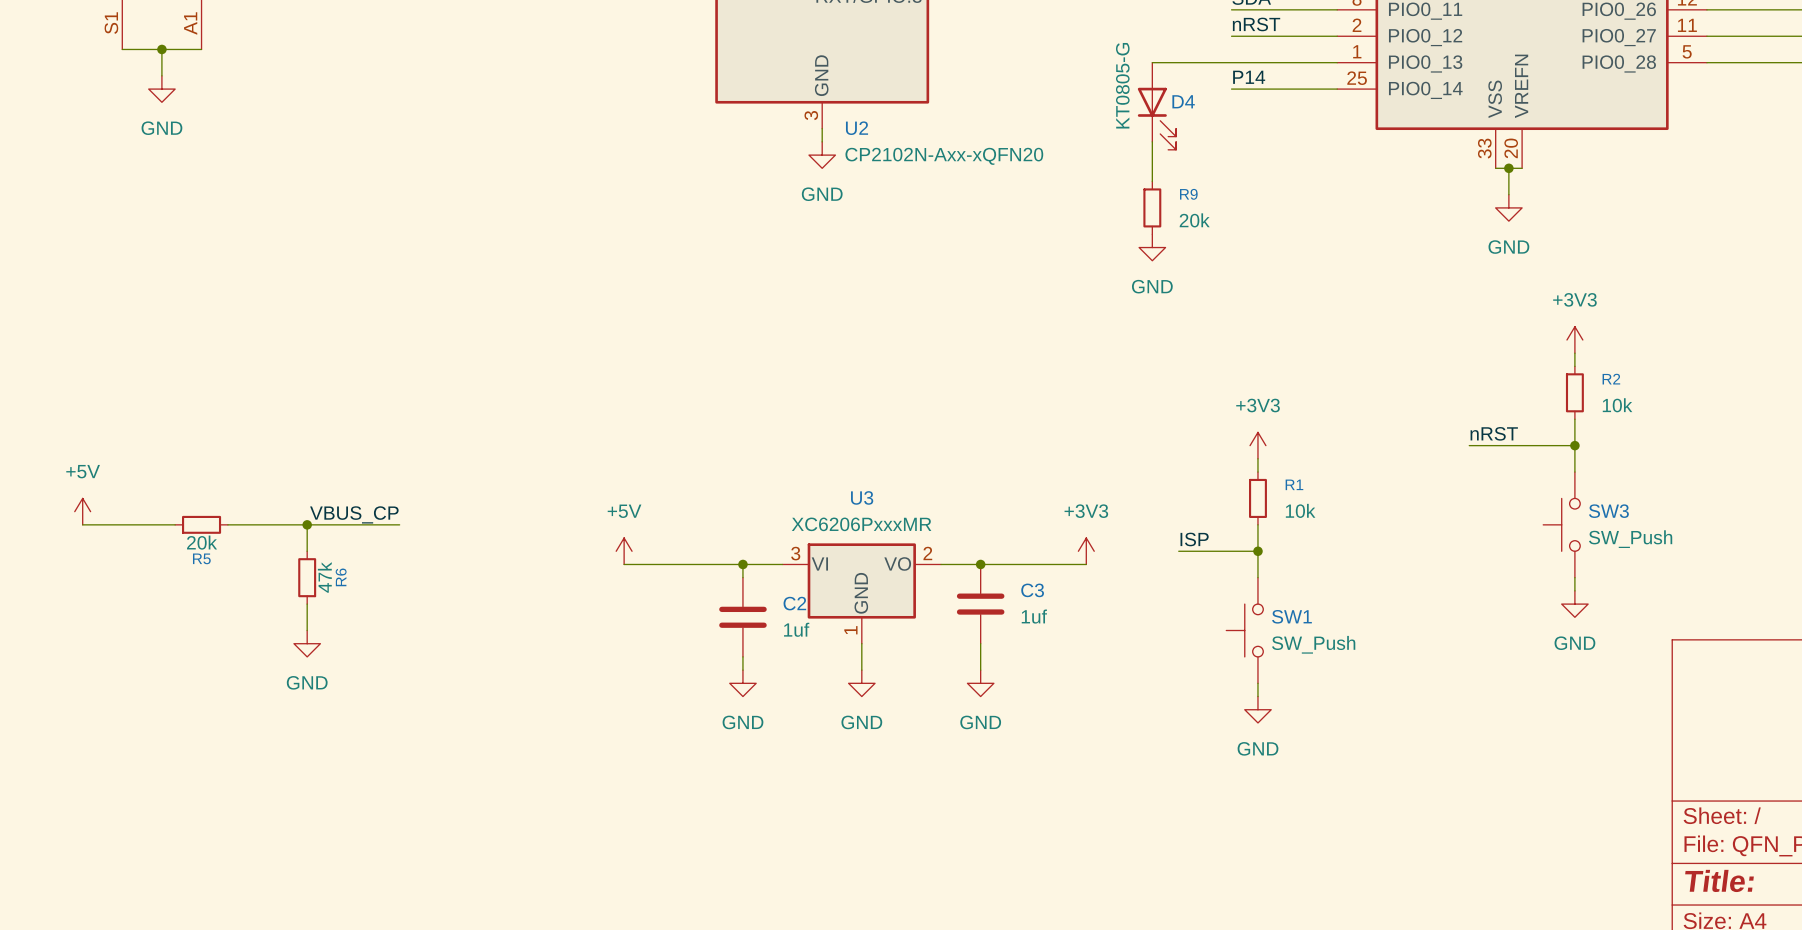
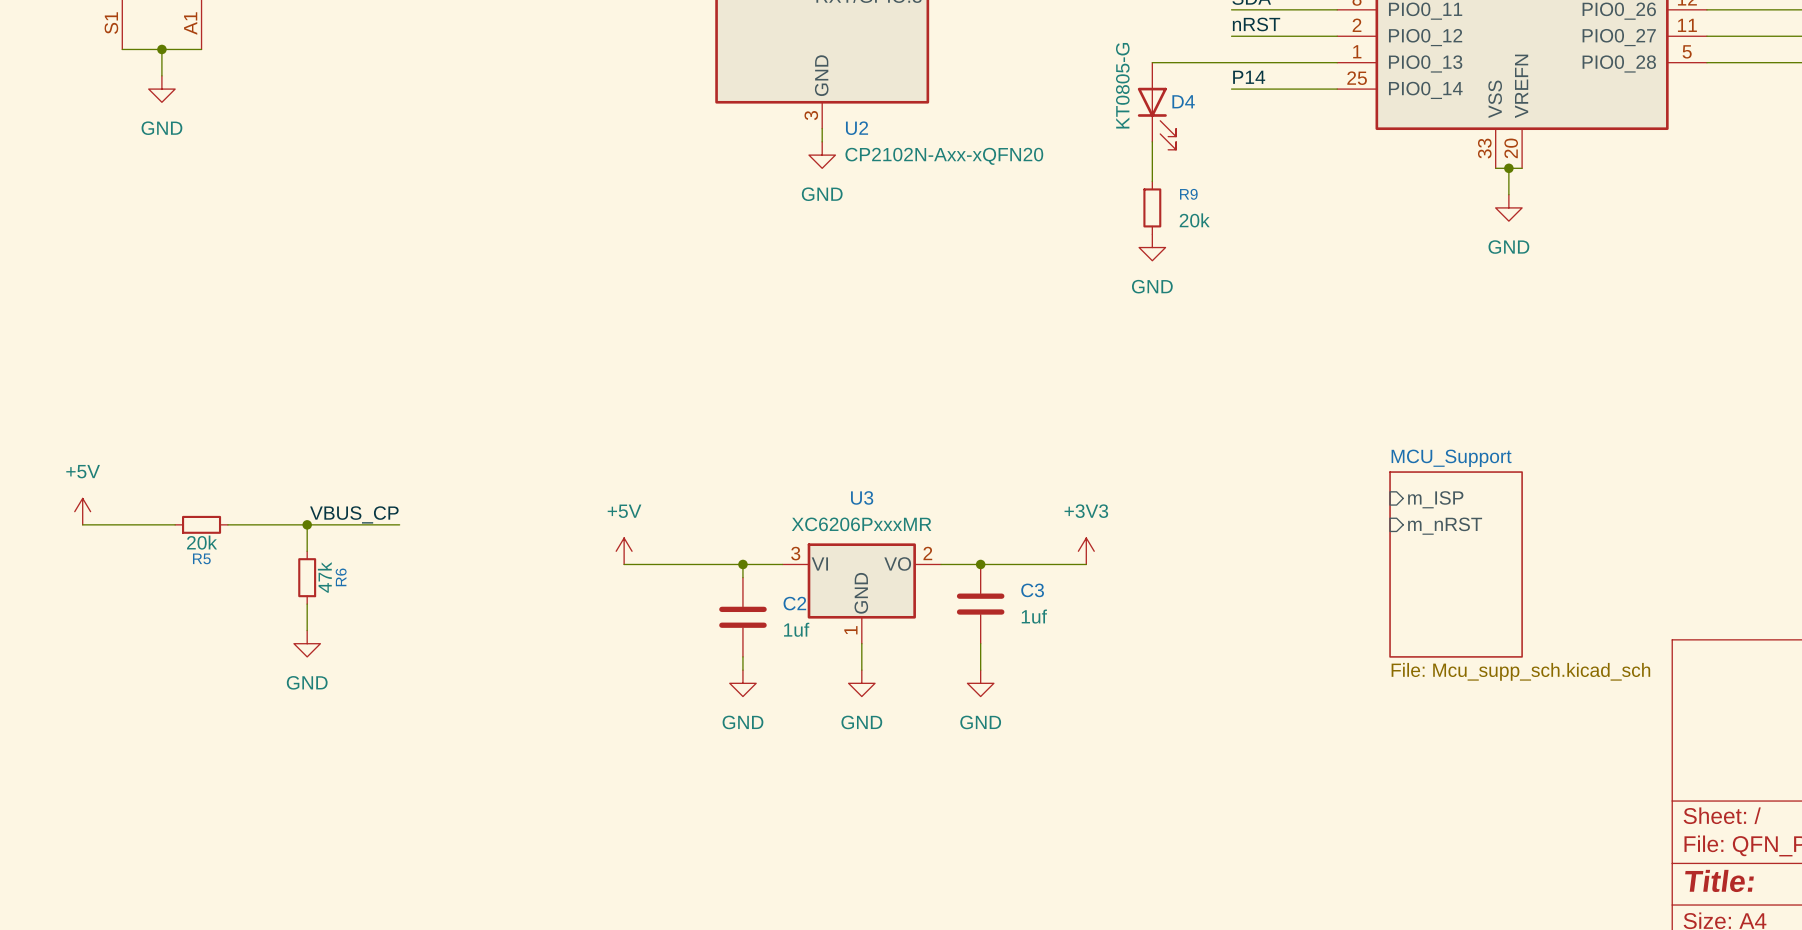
power symbol: +3V3 (1574, 339) -> none
wire: (1574, 353) (1574, 366) -> none
R2: 10k (1574, 392) -> none
wire: (1574, 419) (1574, 472) -> none
label: nRST (1494, 433) -> none
power symbol: +3V3 (1257, 445) -> none
wire: (1469, 445) (1574, 445) -> none
junction: (1574, 445) -> none
wire: (1257, 458) (1257, 472) -> none
R1: 10k (1257, 498) -> none
sheet pin: none -> m_ISP (1435, 499)
wire: (1257, 524) (1257, 577) -> none
SW3: SW_Push (1561, 524) -> none
sheet pin: none -> m_nRST (1445, 526)
label: ISP (1194, 539) -> none
wire: (1178, 551) (1257, 551) -> none
junction: (1257, 551) -> none
sheet MCU_Support: none -> File: Mcu_supp_sch.kicad_sch (1456, 564)
wire: (1574, 577) (1574, 590) -> none
power symbol: GND (1574, 604) -> none
SW1: SW_Push (1244, 630) -> none
wire: (1257, 683) (1257, 696) -> none
power symbol: GND (1257, 709) -> none

